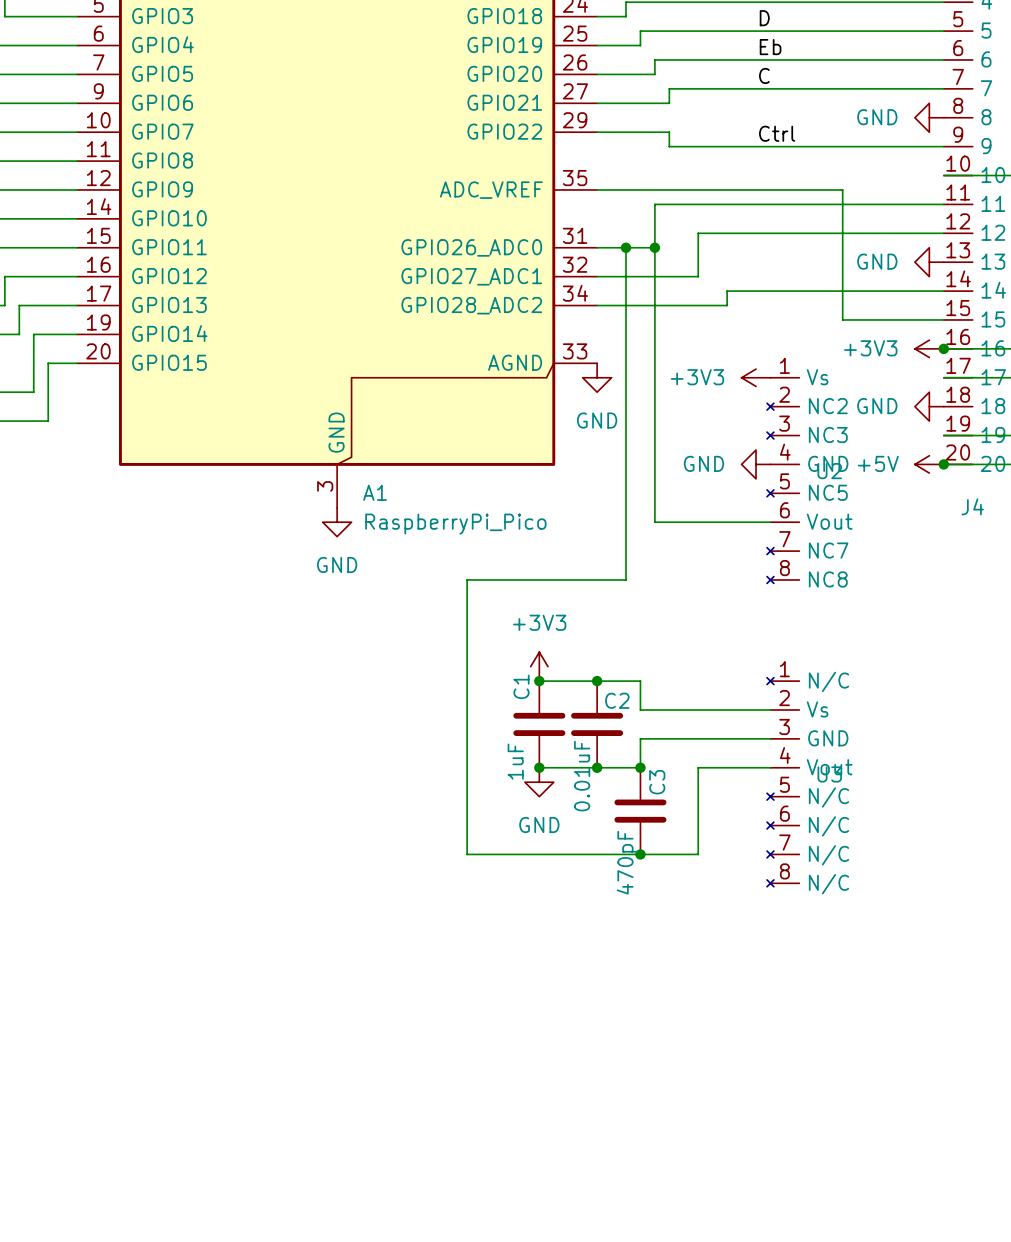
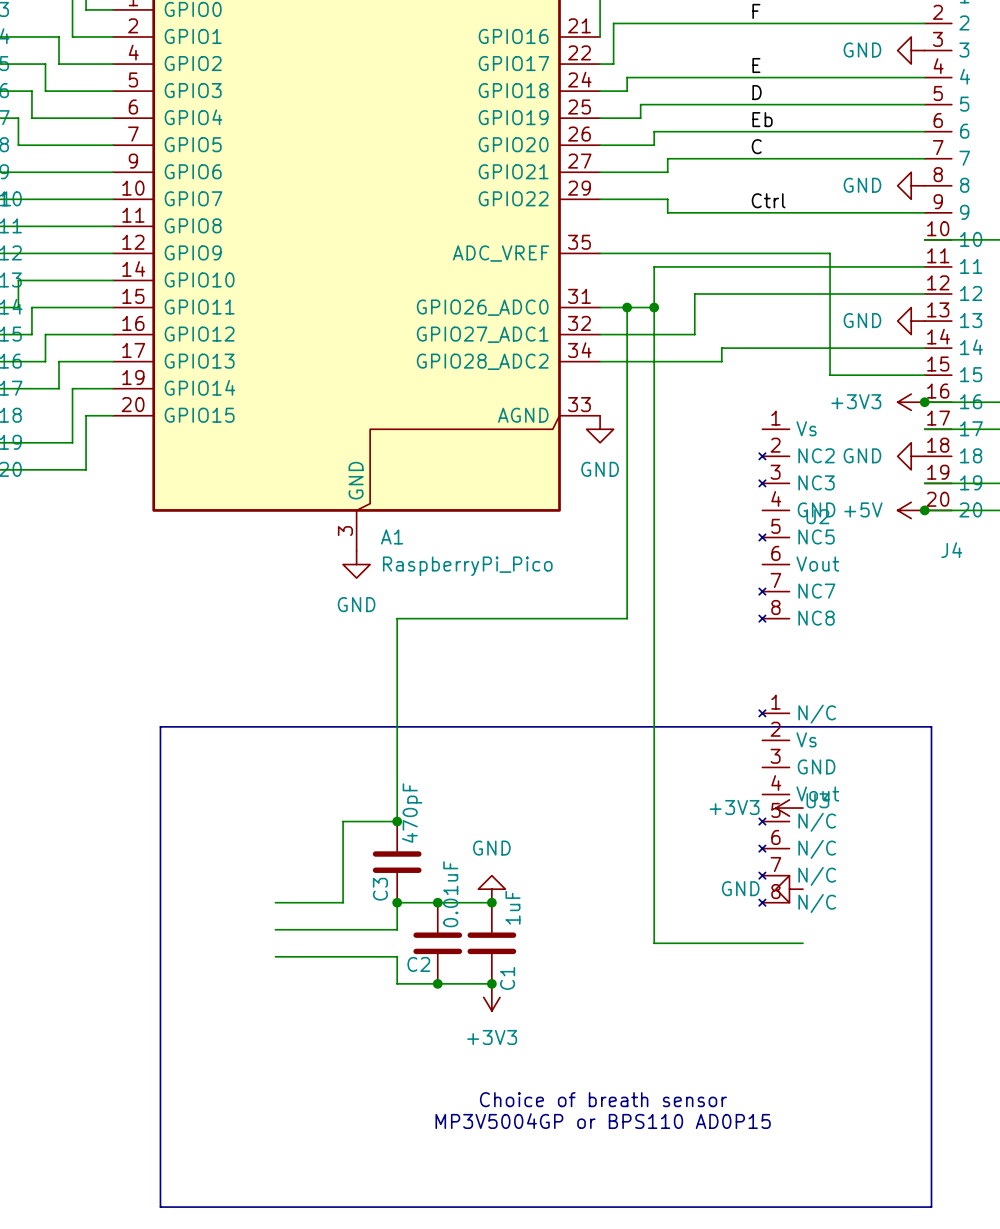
power symbol: +3V3 (756, 377) -> none
power symbol: GND (756, 464) -> none
wire: (654, 522) (770, 522) -> (654, 564) (654, 943) (802, 943)
wire: (467, 579) (467, 854) (698, 854) (698, 767) (770, 767) -> (478, 618) (397, 618) (397, 821) (343, 821) (343, 902) (275, 902)
power symbol: +3V3 (539, 666) -> none
wire: (539, 681) (640, 681) (640, 709) (770, 709) -> none
junction: (539, 681) -> none
junction: (597, 681) -> none
C1 name position: C1 (521, 686) -> C1 (507, 978)
line: none -> (160, 726) (931, 726) (931, 1207) (160, 1207) (160, 726)
C2 name position: C2 (617, 700) -> C2 (418, 964)
C1 position: (539, 724) -> (491, 943)
C2 position: (597, 724) -> (437, 943)
wire: (770, 738) (640, 738) (640, 767) (539, 767) -> none
C1 value position: 1uF (515, 761) -> 1uF (513, 907)
junction: (539, 767) -> none
junction: (597, 767) -> none
junction: (640, 767) -> none
C2 value position: 0.01uF (582, 776) -> 0.01uF (450, 894)
power symbol rotation: 0° (539, 782) -> 180° (491, 889)
power symbol position: GND (539, 782) -> GND (491, 889)
C3 name position: C3 (657, 782) -> C3 (380, 889)
power symbol: none -> +3V3 (789, 808)
junction: none -> (397, 821)
C3 position: (640, 811) -> (397, 862)
junction: (640, 854) -> none
C3 value position: 470pF (627, 862) -> 470pF (412, 813)
power symbol: none -> GND (789, 889)
junction: none -> (397, 902)
junction: none -> (437, 902)
wire: none -> (491, 902) (397, 902) (397, 929) (275, 929)
junction: none -> (491, 902)
wire: none -> (275, 956) (397, 956) (397, 983) (491, 983)
junction: none -> (437, 983)
junction: none -> (491, 983)
power symbol: none -> +3V3 (491, 997)
text: none -> Choice of breath sensor (603, 1099)
text: none -> MP3V5004GP or BPS110 AD0P15 (603, 1121)

